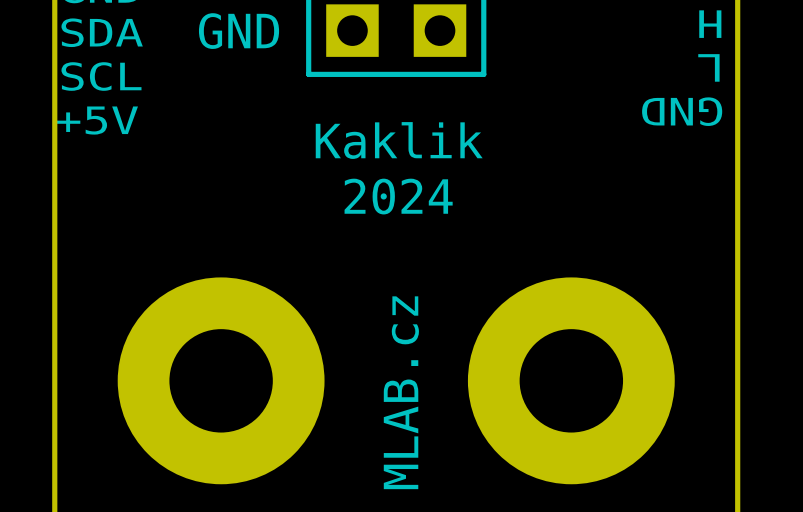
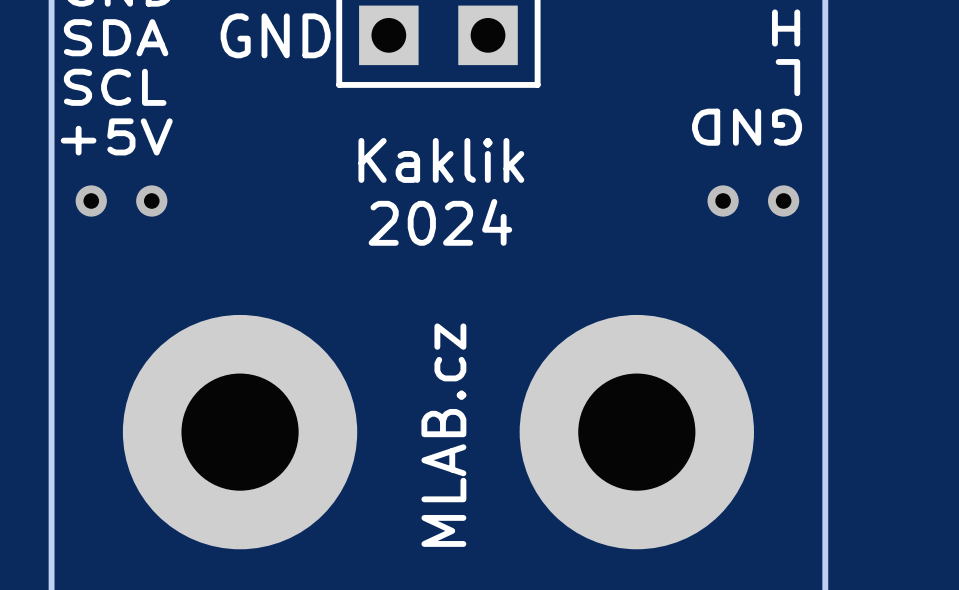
via: none -> (91, 200)
via: none -> (151, 200)
via: none -> (723, 200)
via: none -> (783, 200)

